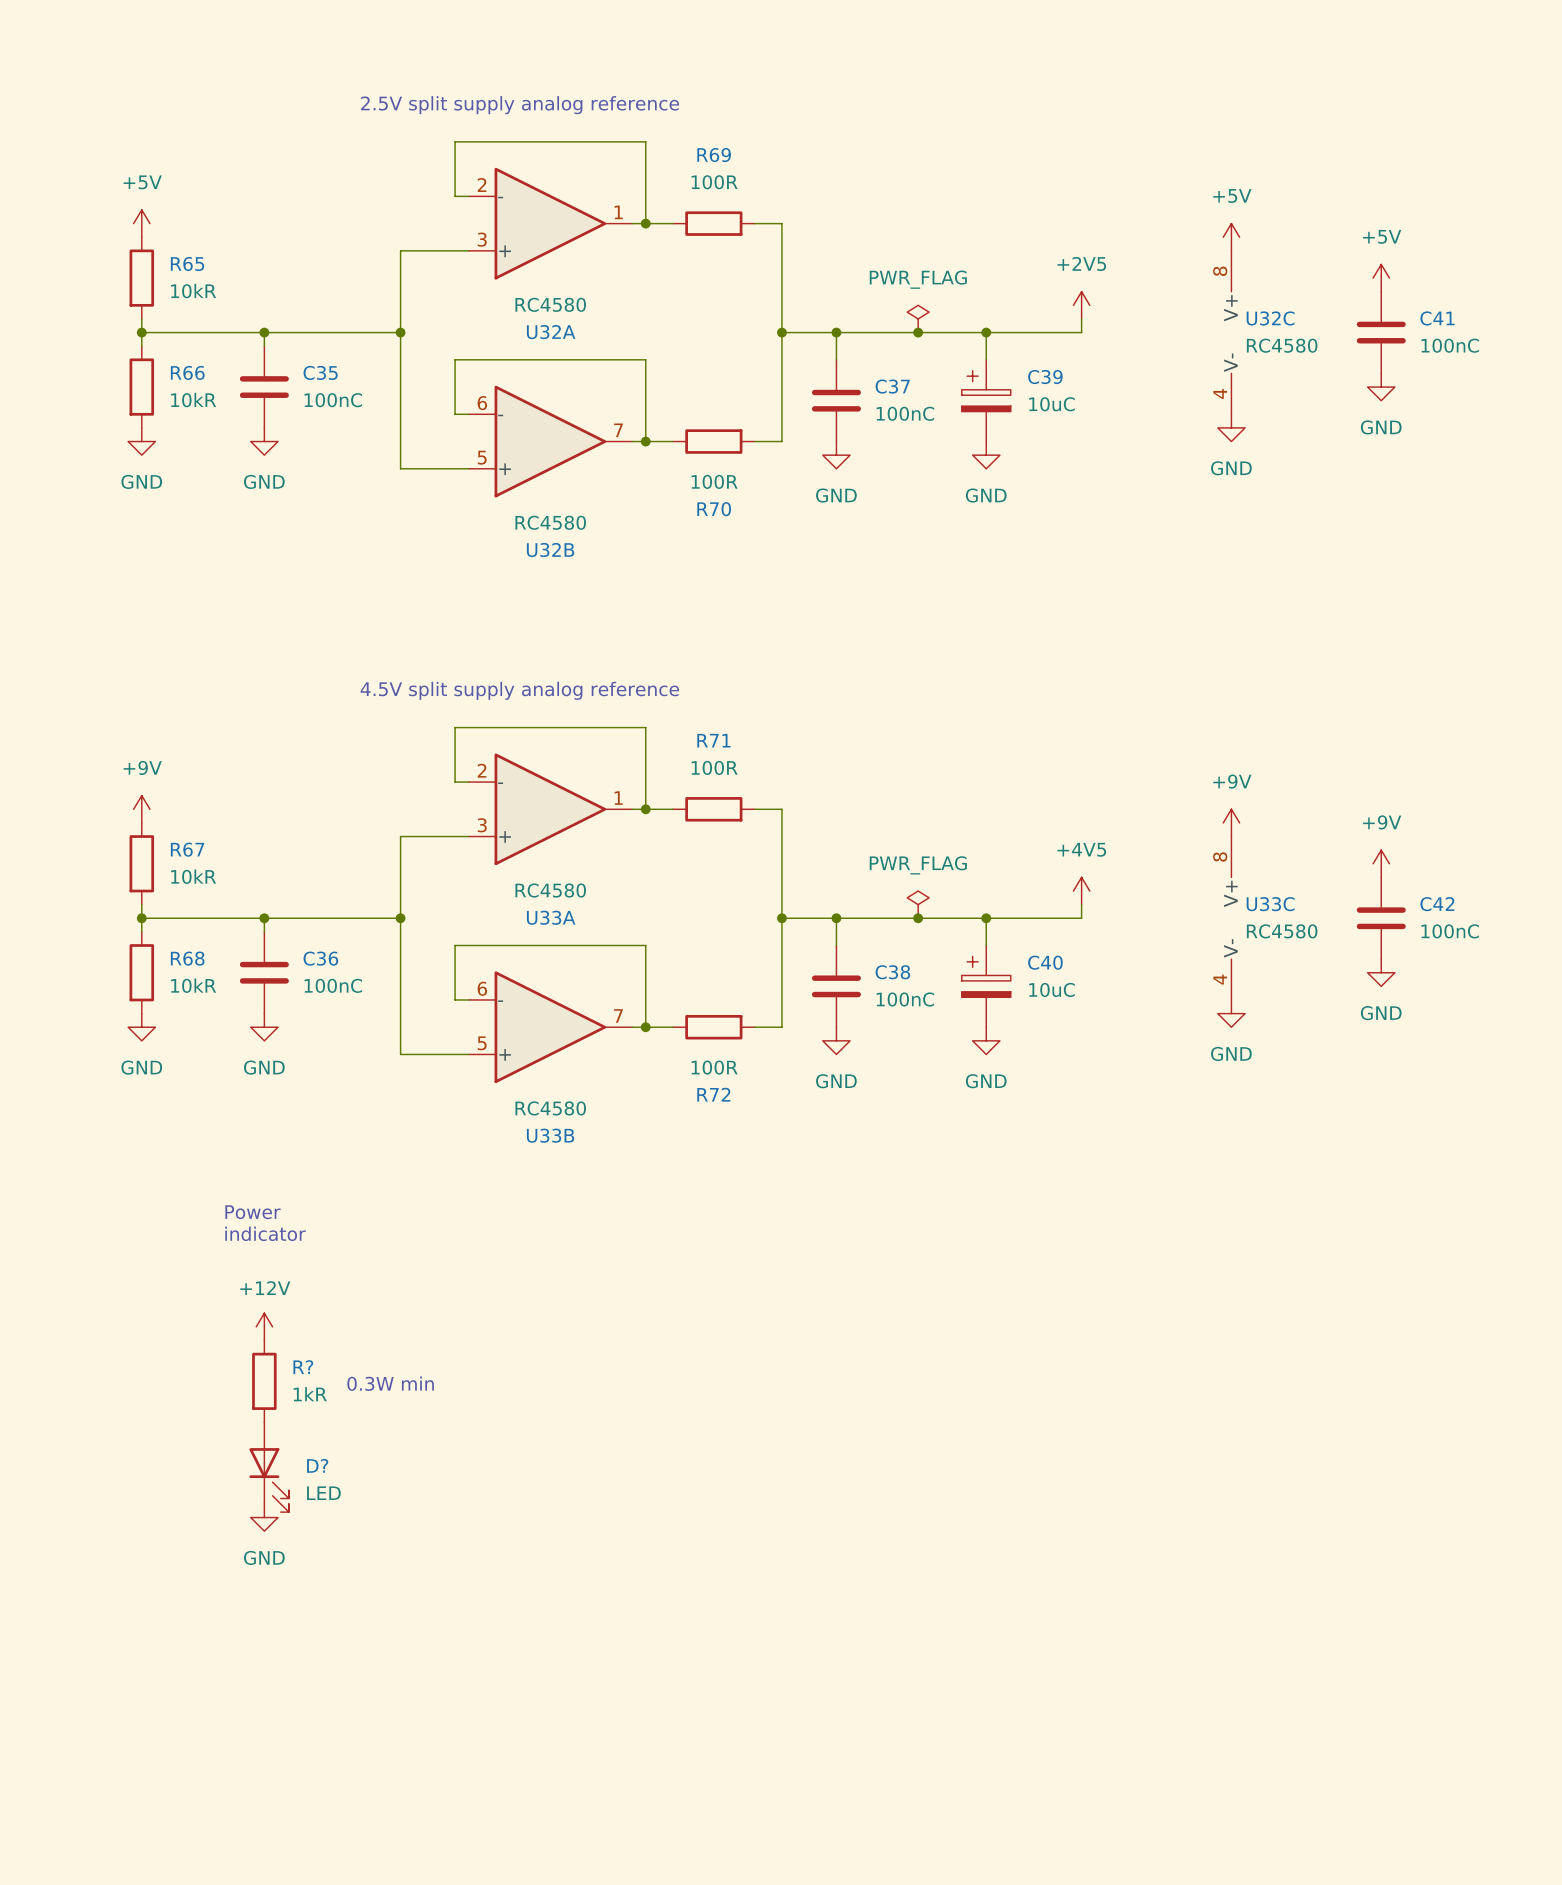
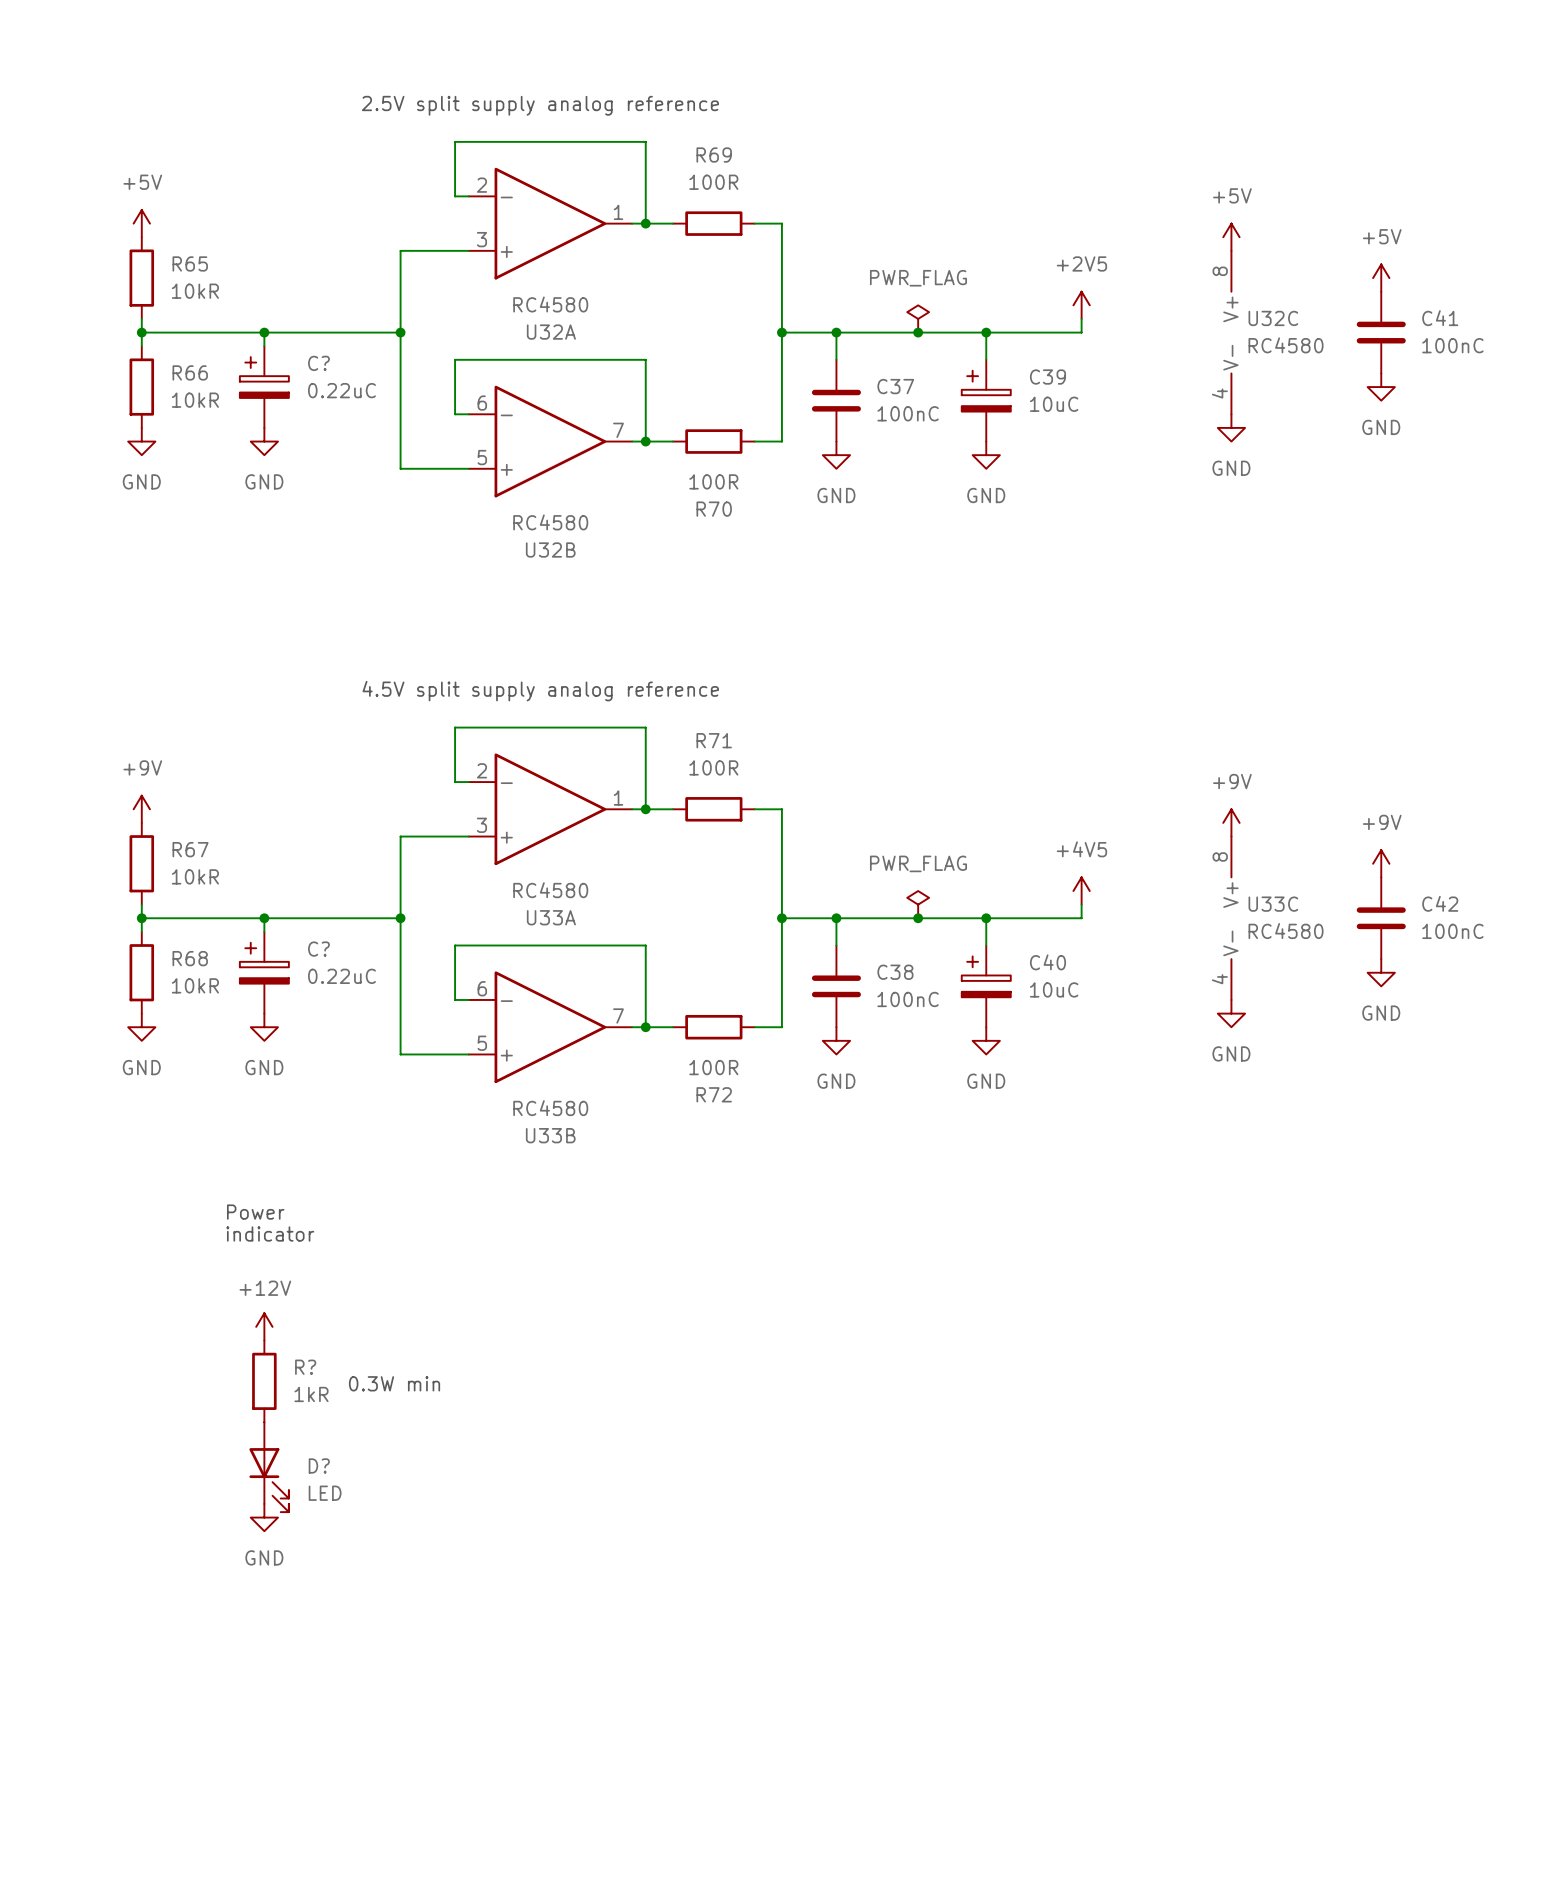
C35: 100nC (264, 387) -> none
C?: none -> 0.22uC (264, 387)
C36: 100nC (264, 972) -> none
C?: none -> 0.22uC (264, 972)

